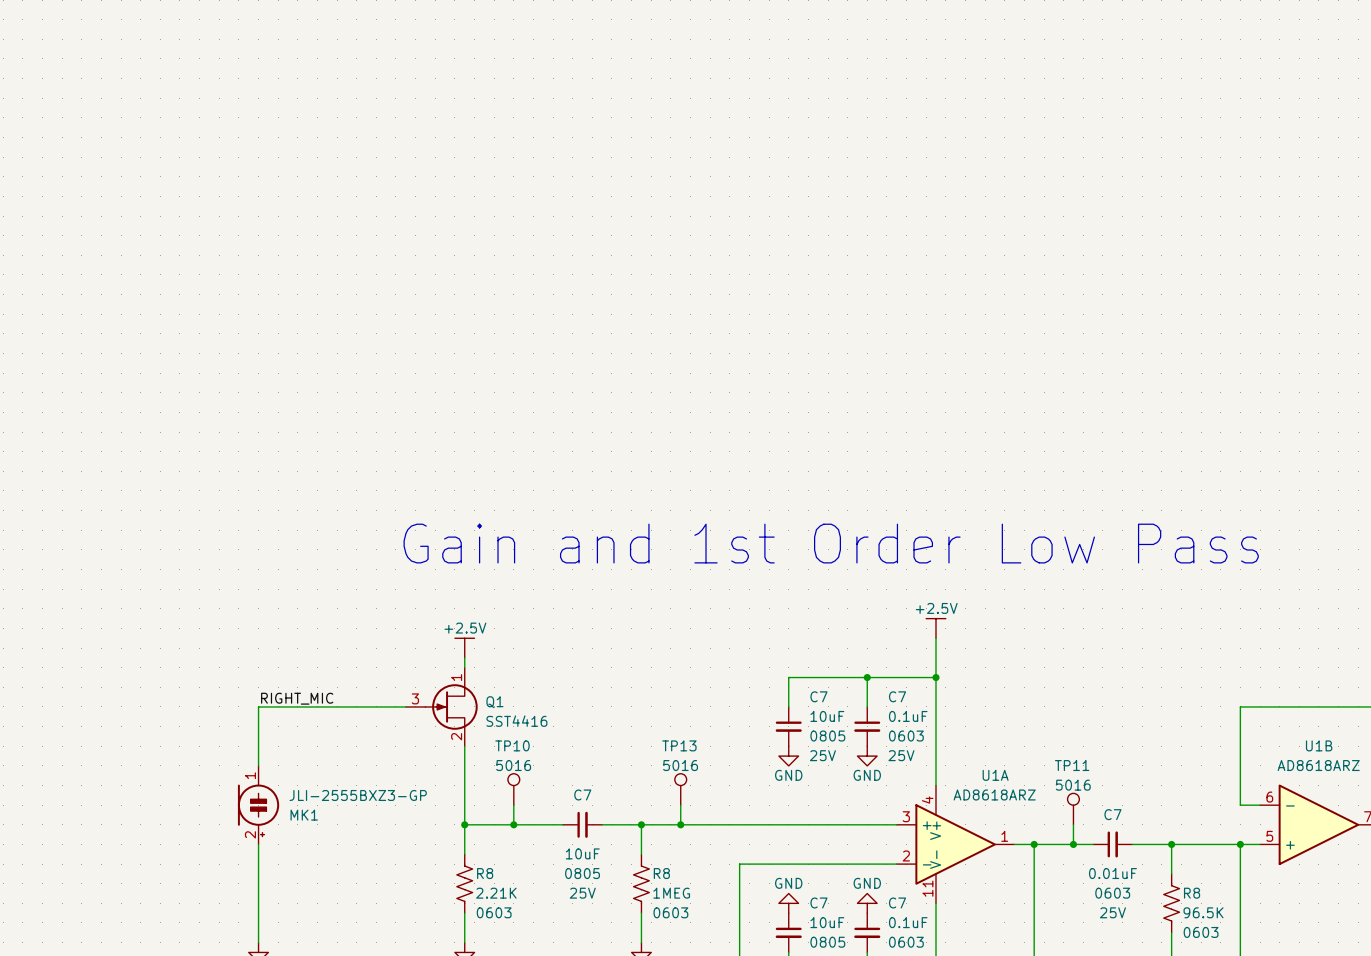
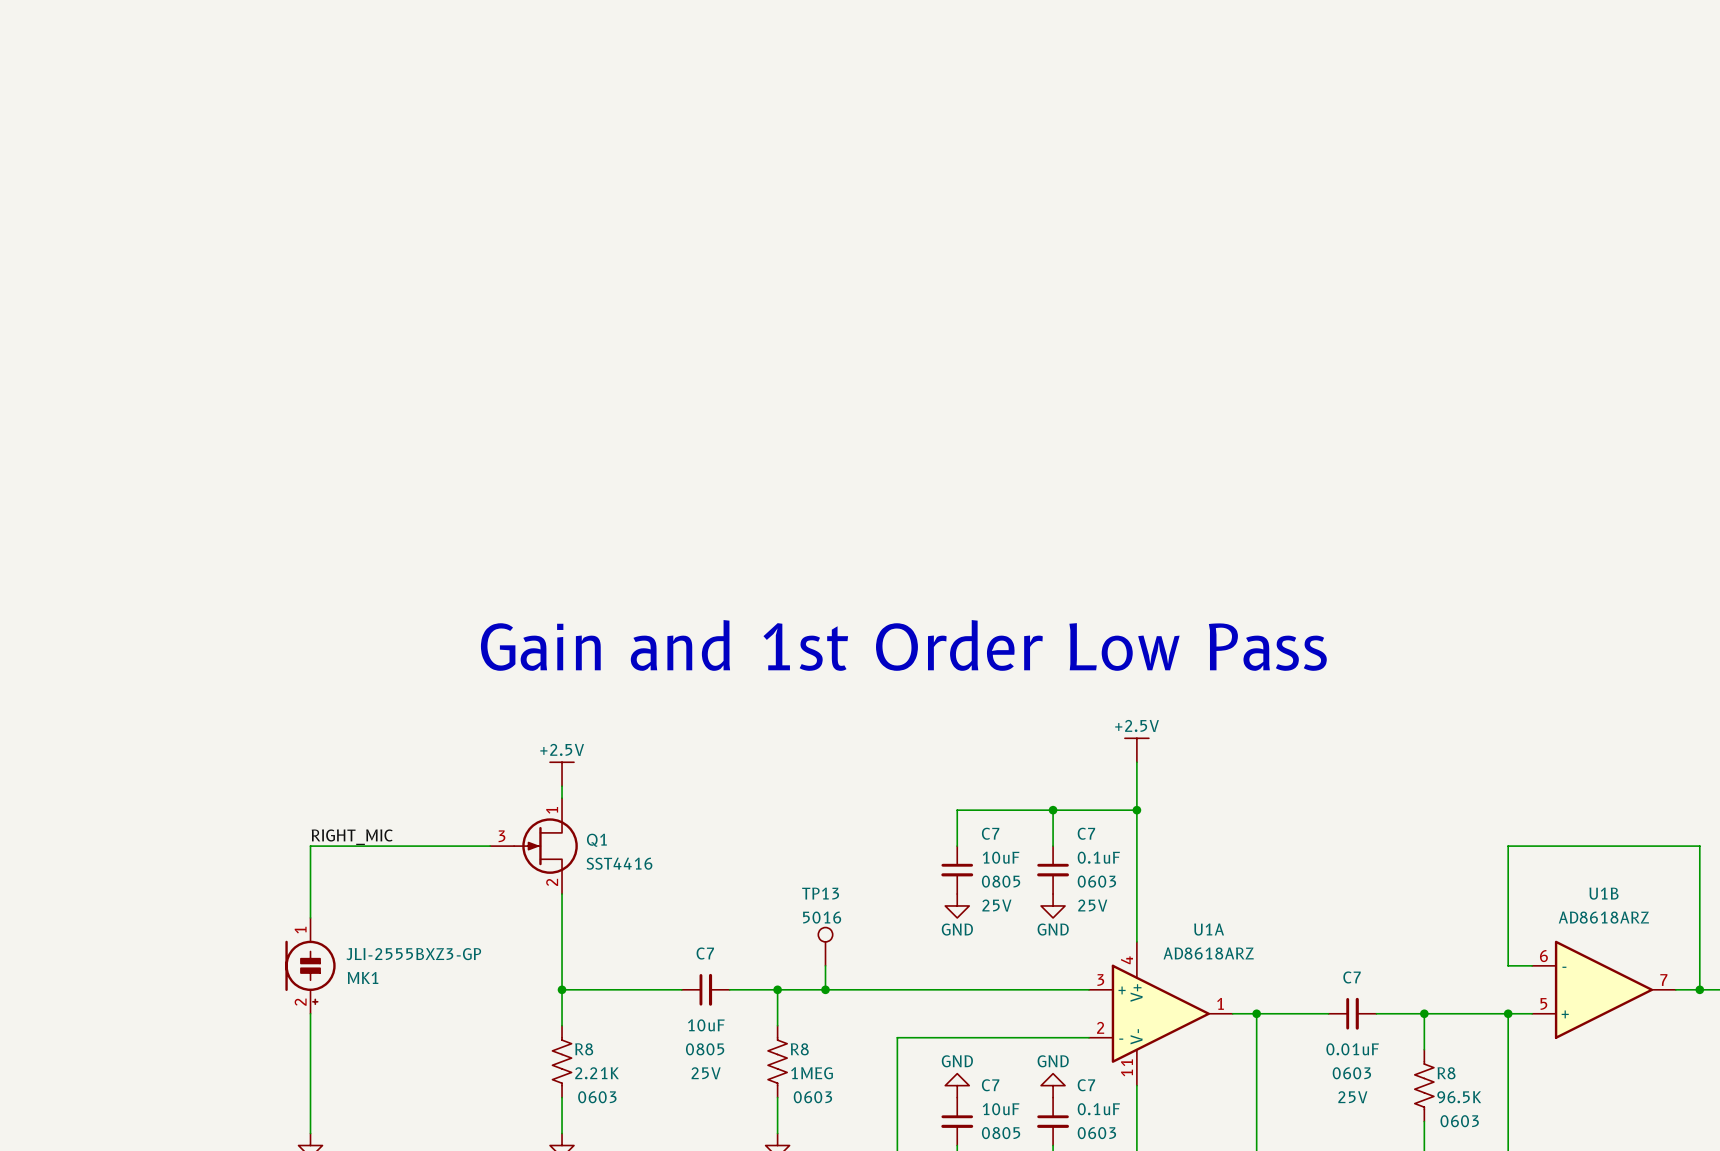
TP10: 5016 (513, 789) -> none
wire: (513, 805) (513, 824) -> none
TP11: 5016 (1073, 809) -> none
junction: (513, 824) -> none
wire: (1073, 824) (1073, 844) -> none
junction: (1073, 844) -> none

